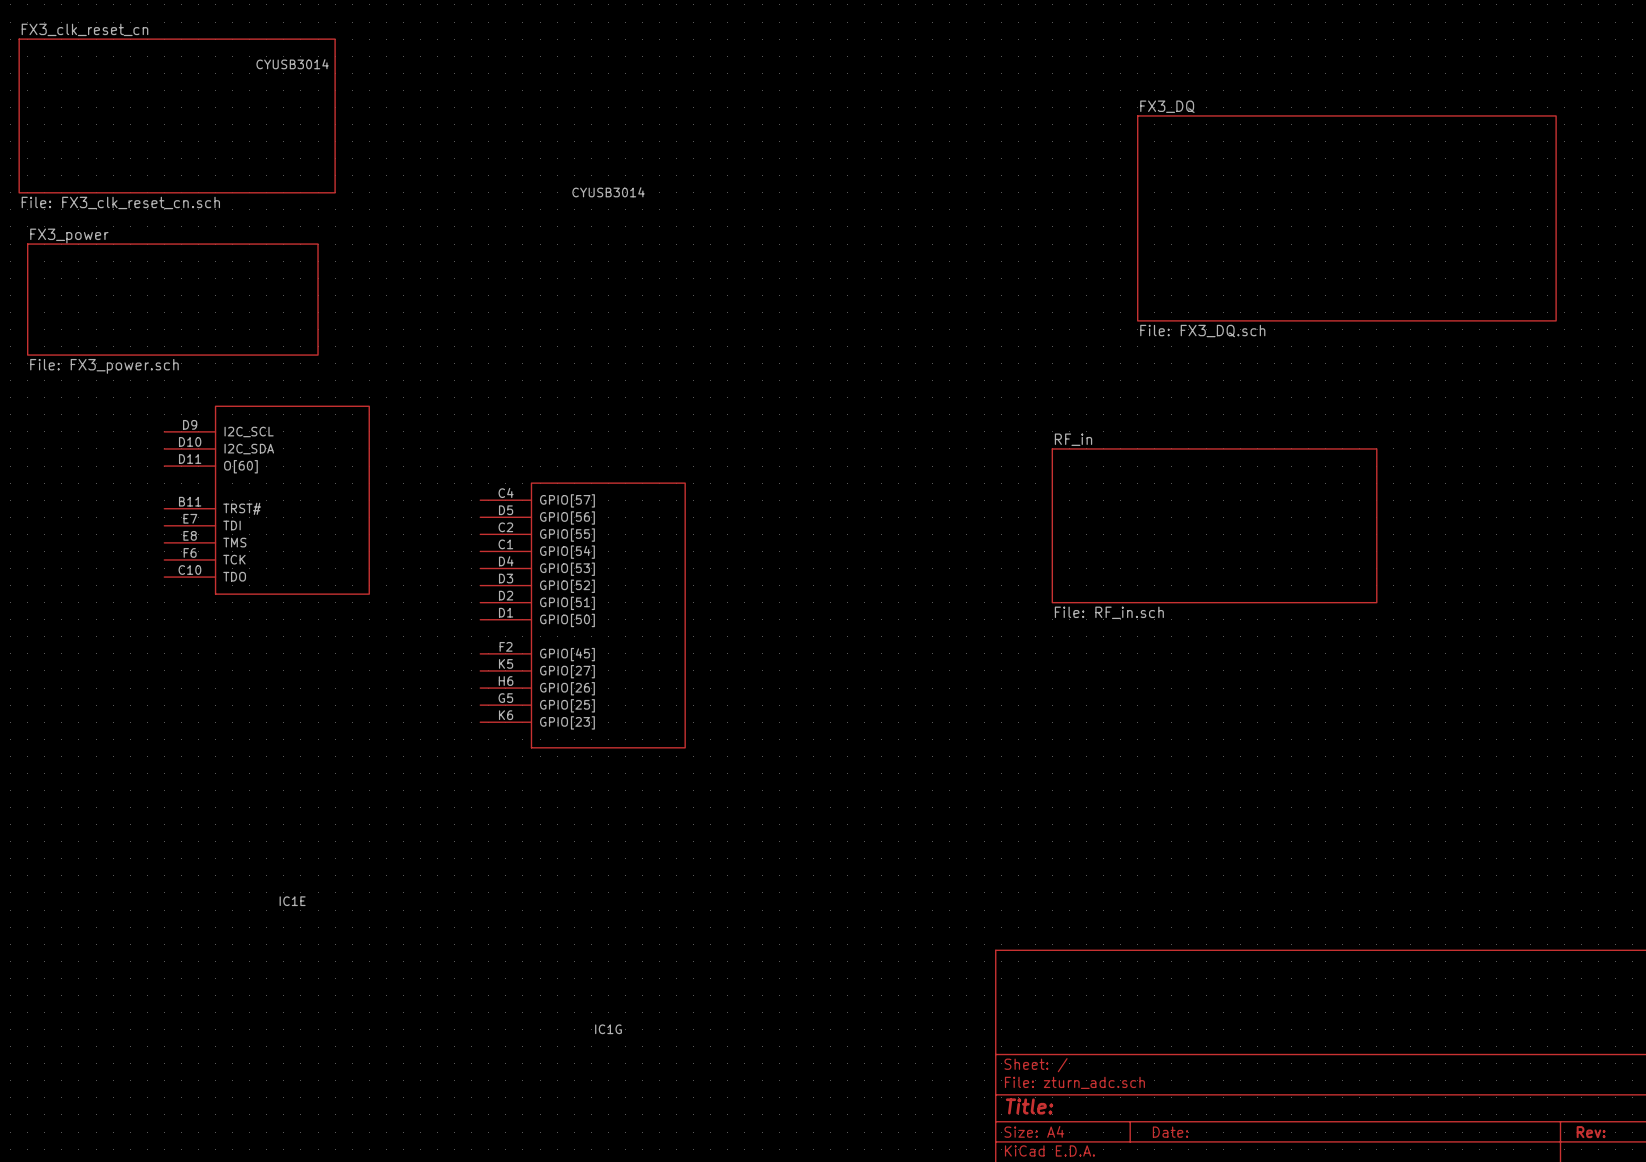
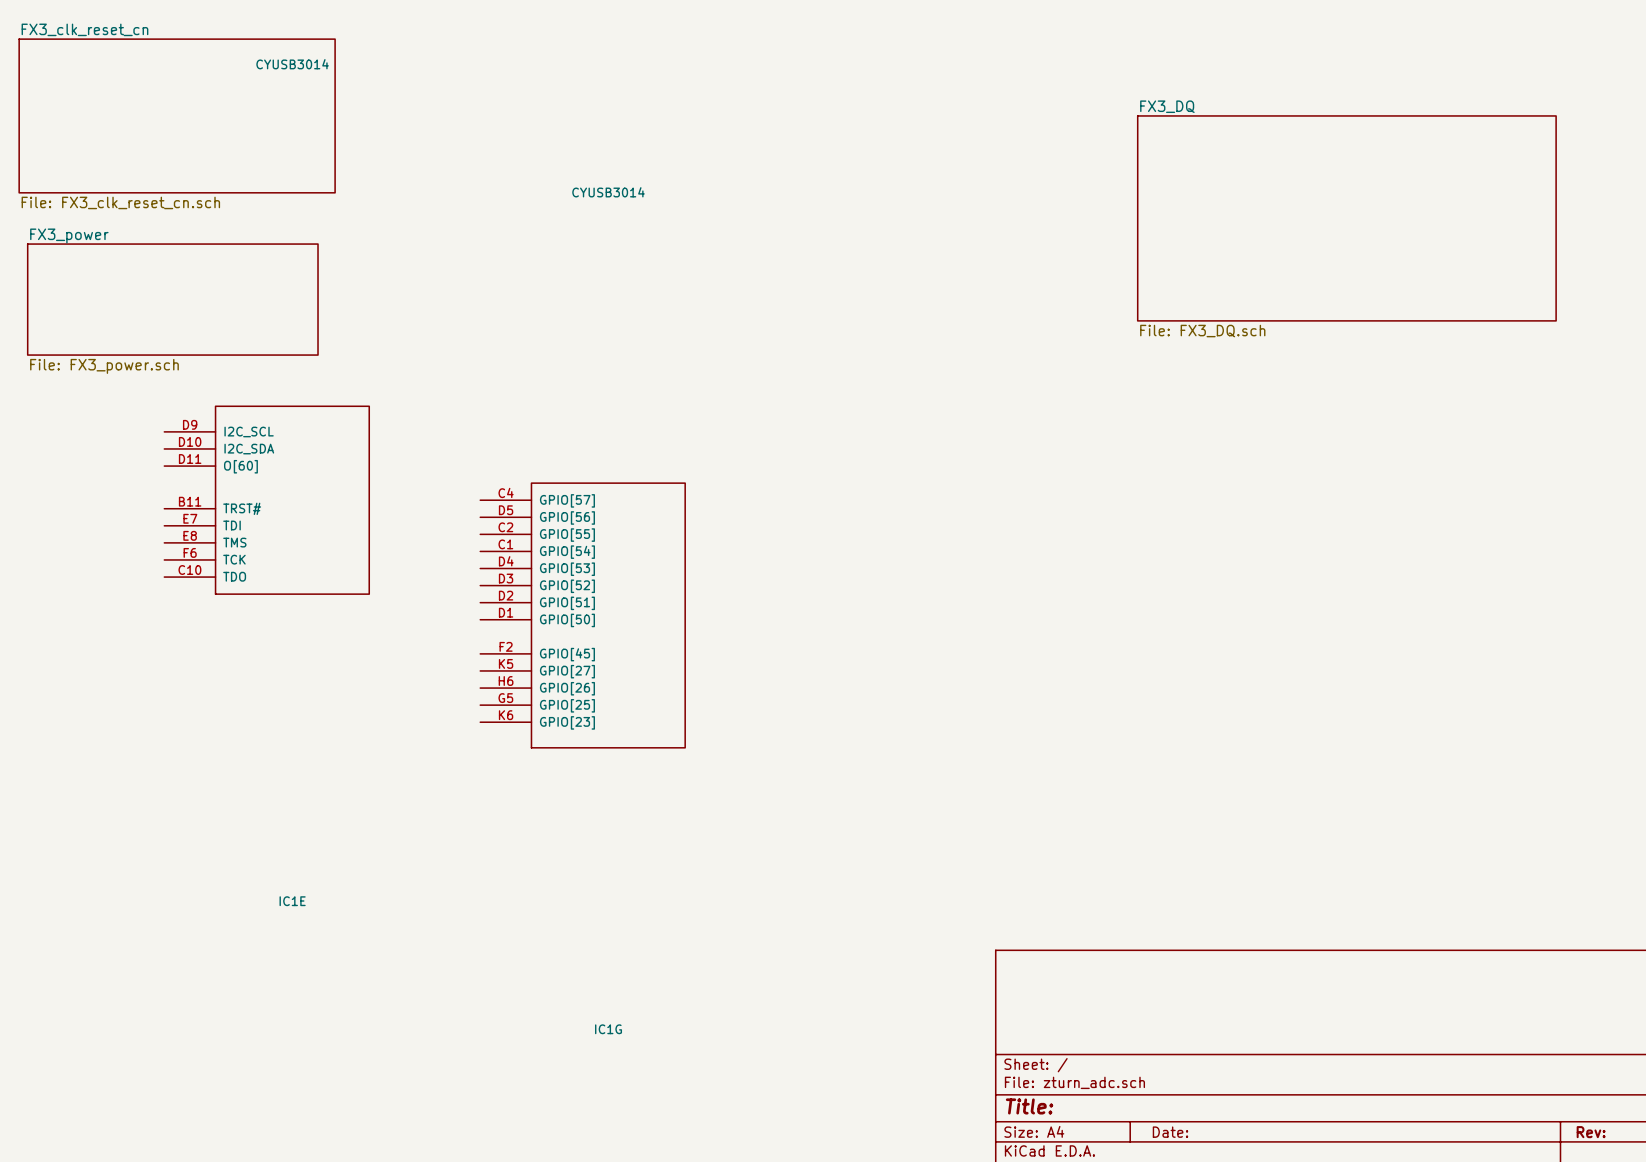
sheet RF_in: File: RF_in.sch (1214, 525) -> none

